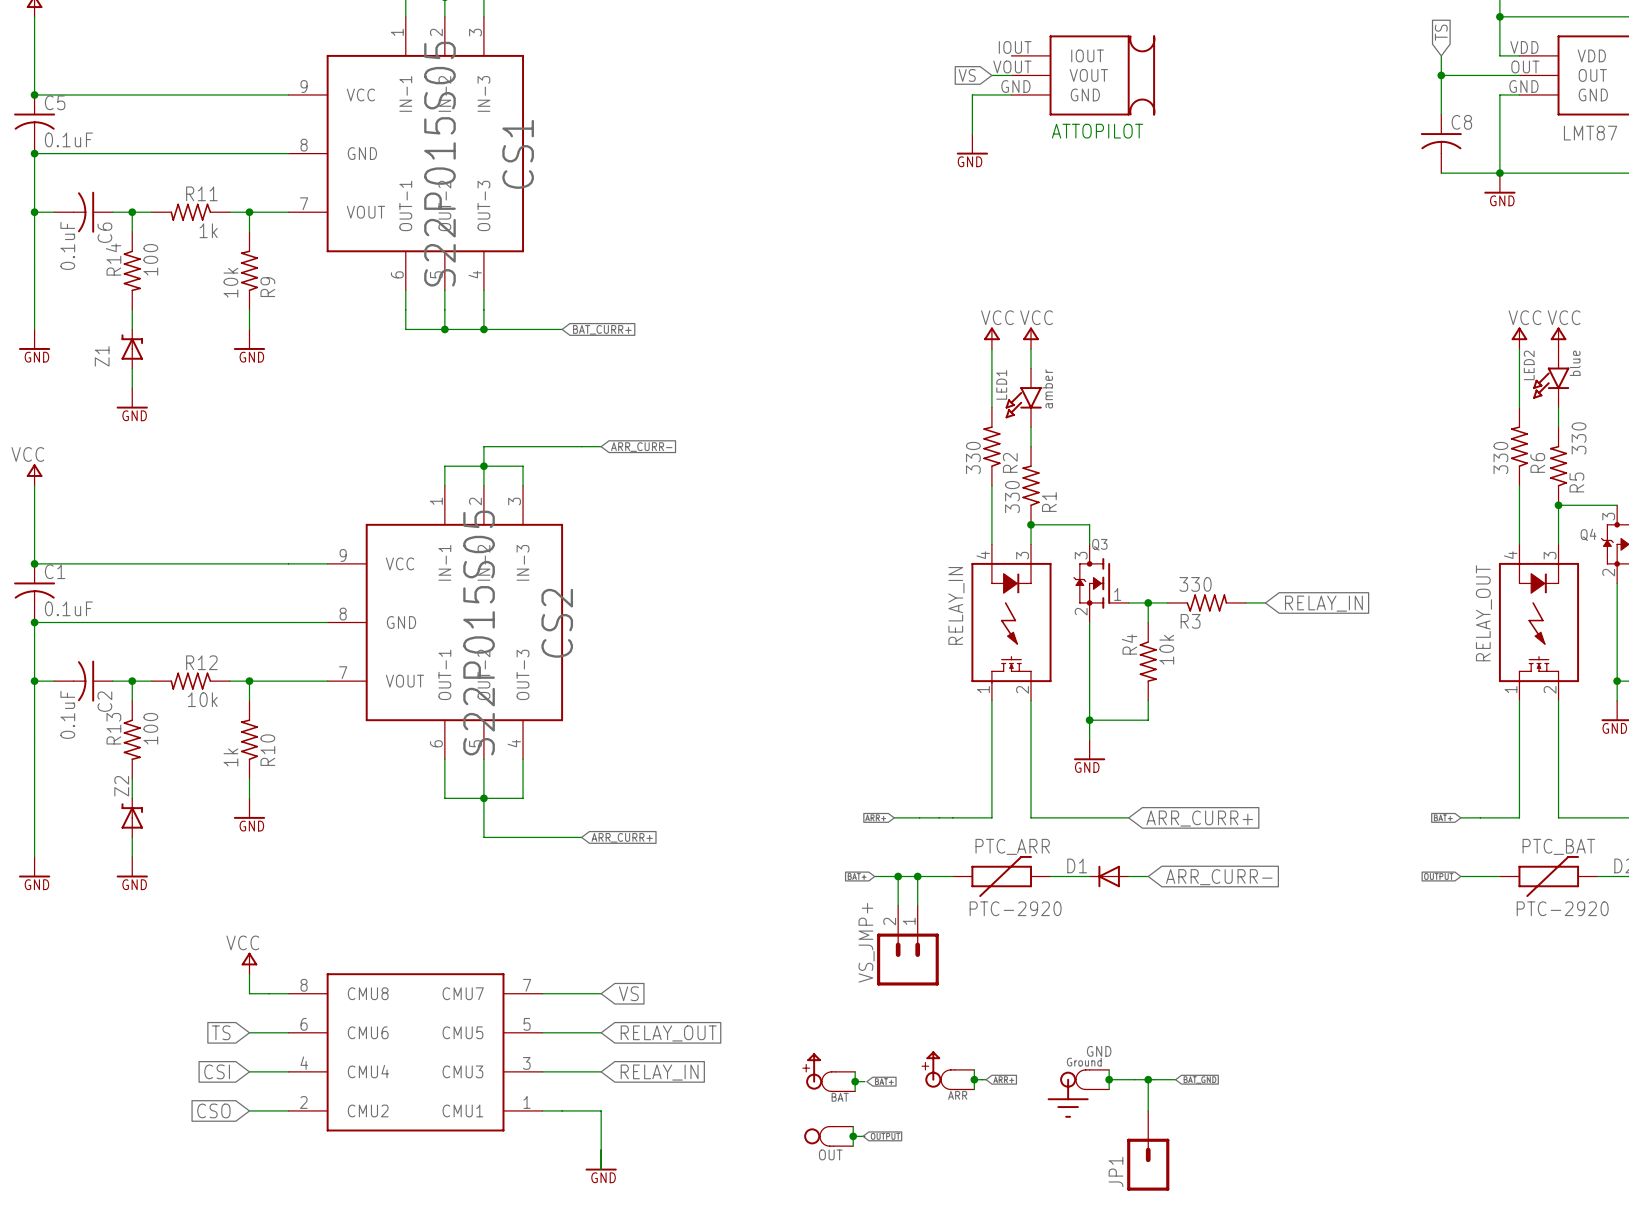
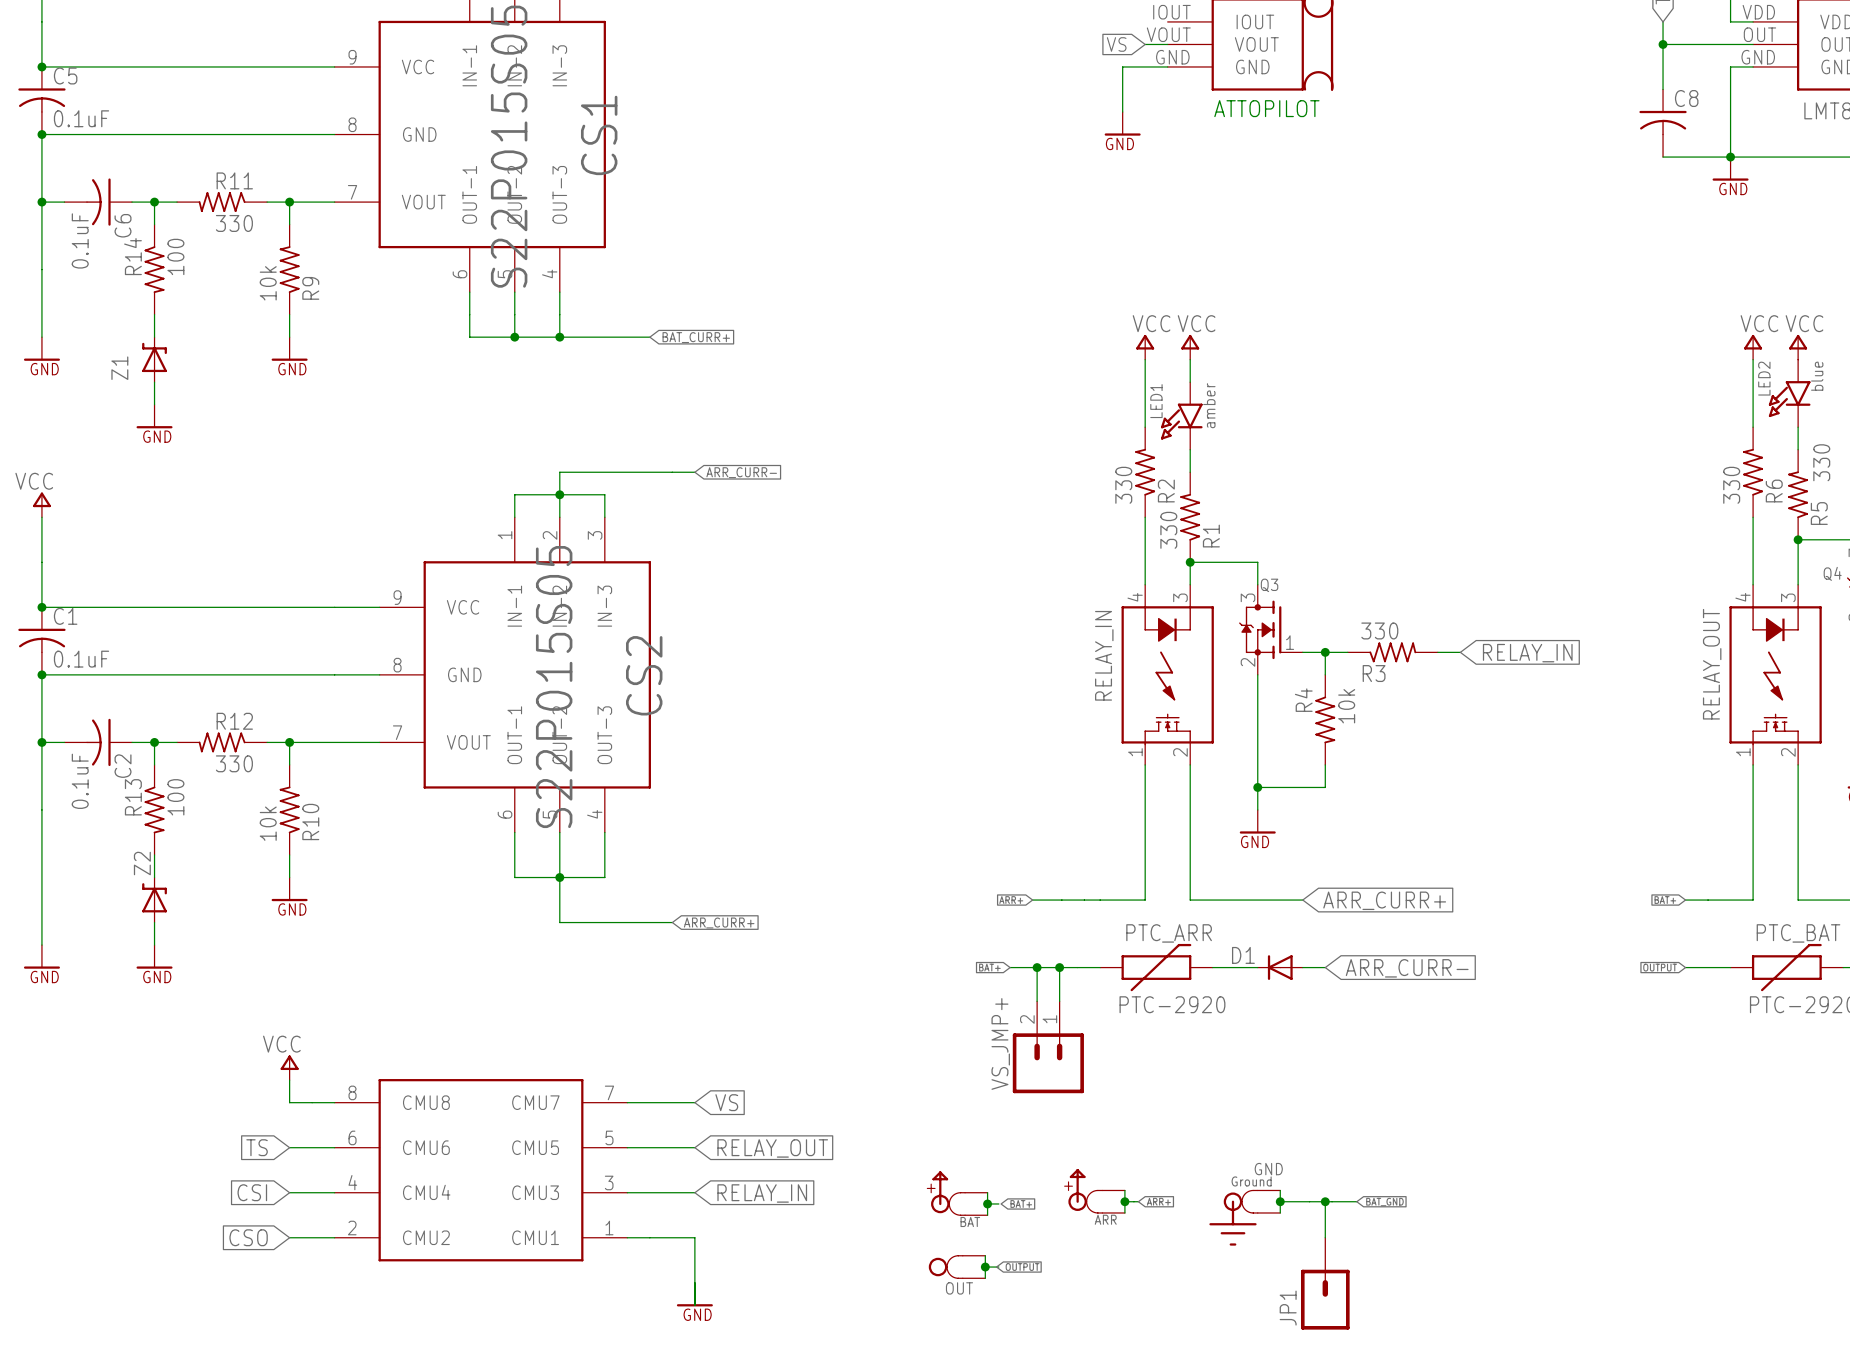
R11 value: 1k (208, 230) -> 330 (234, 223)
R12 value: 10k (202, 699) -> 330 (234, 763)
R10 value: 1k (230, 757) -> 10k (268, 823)

